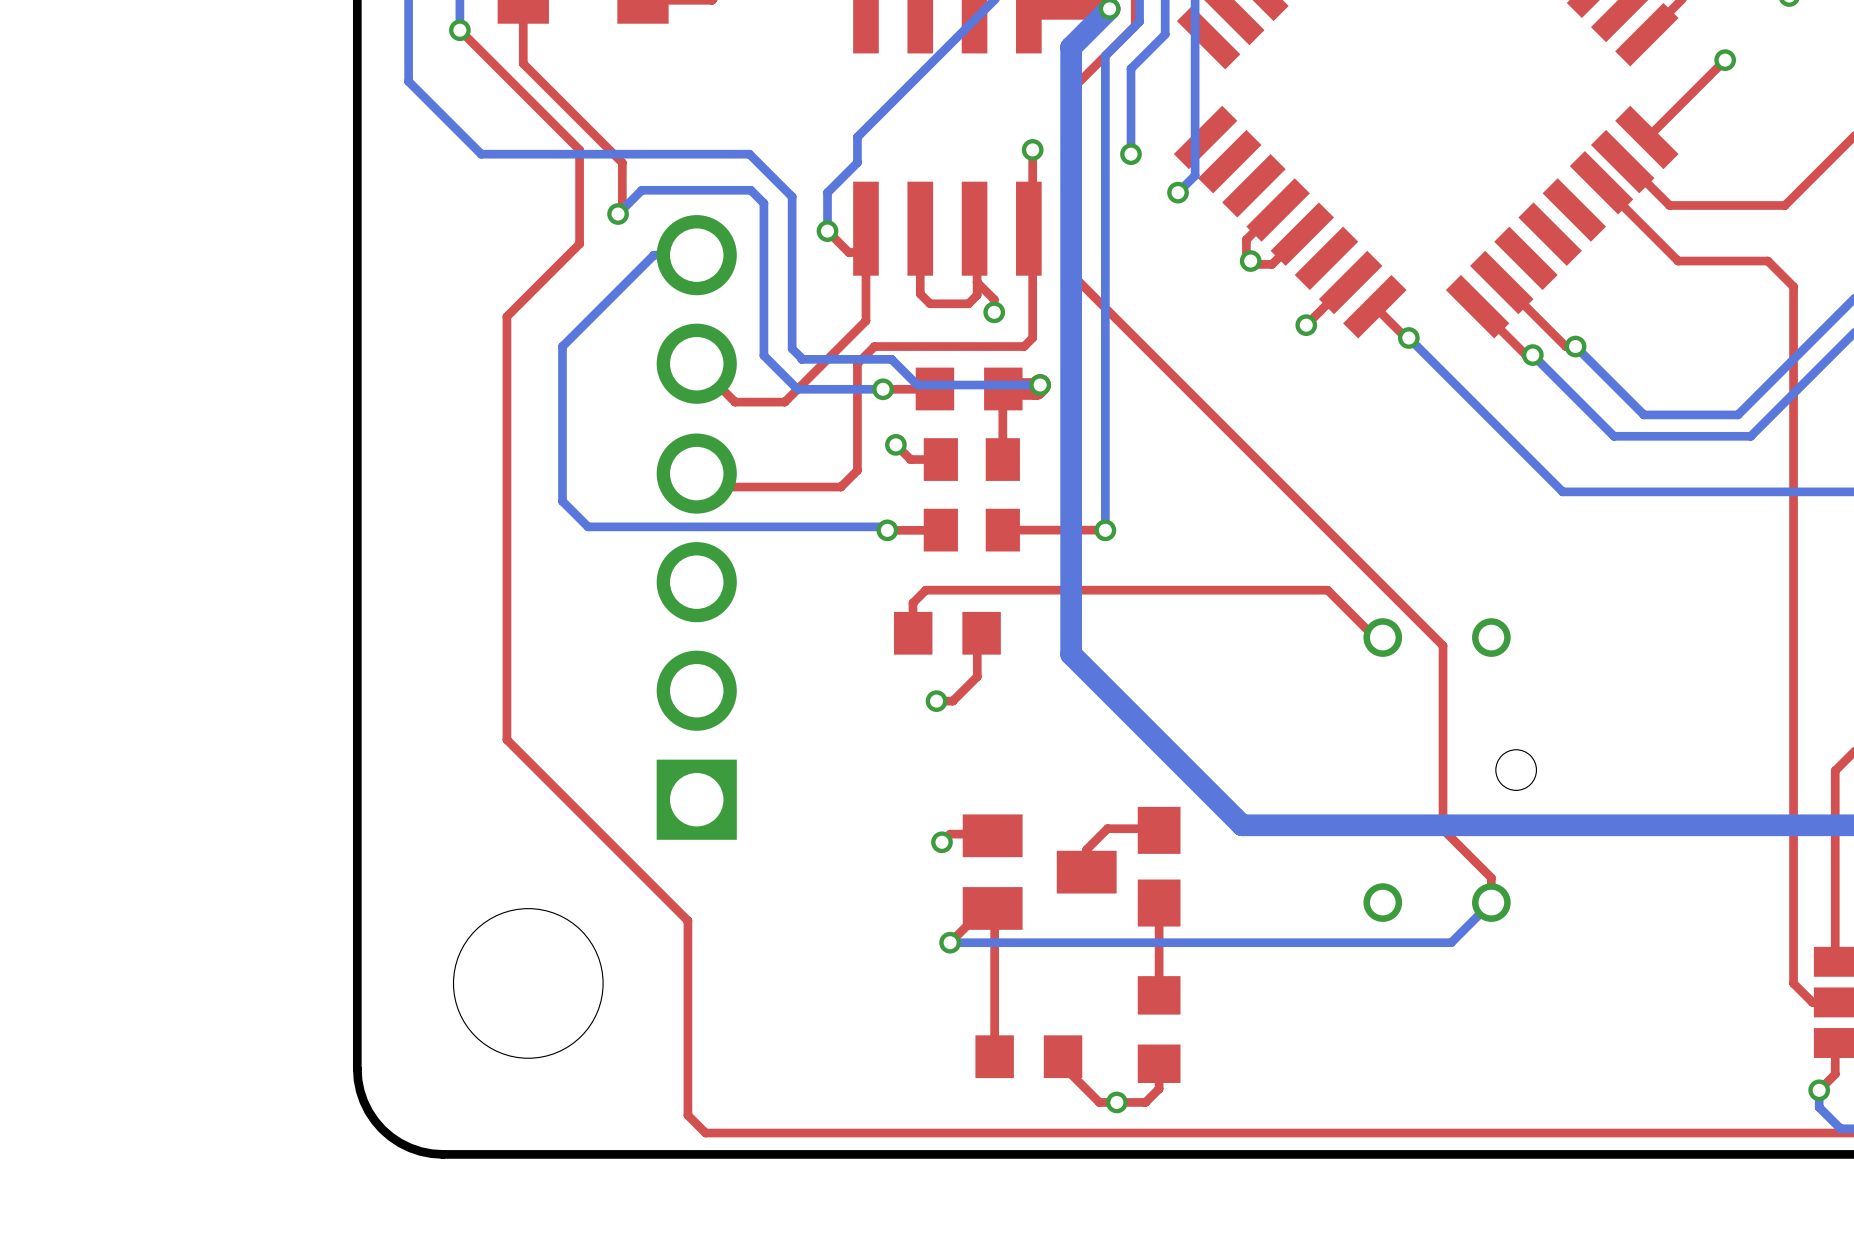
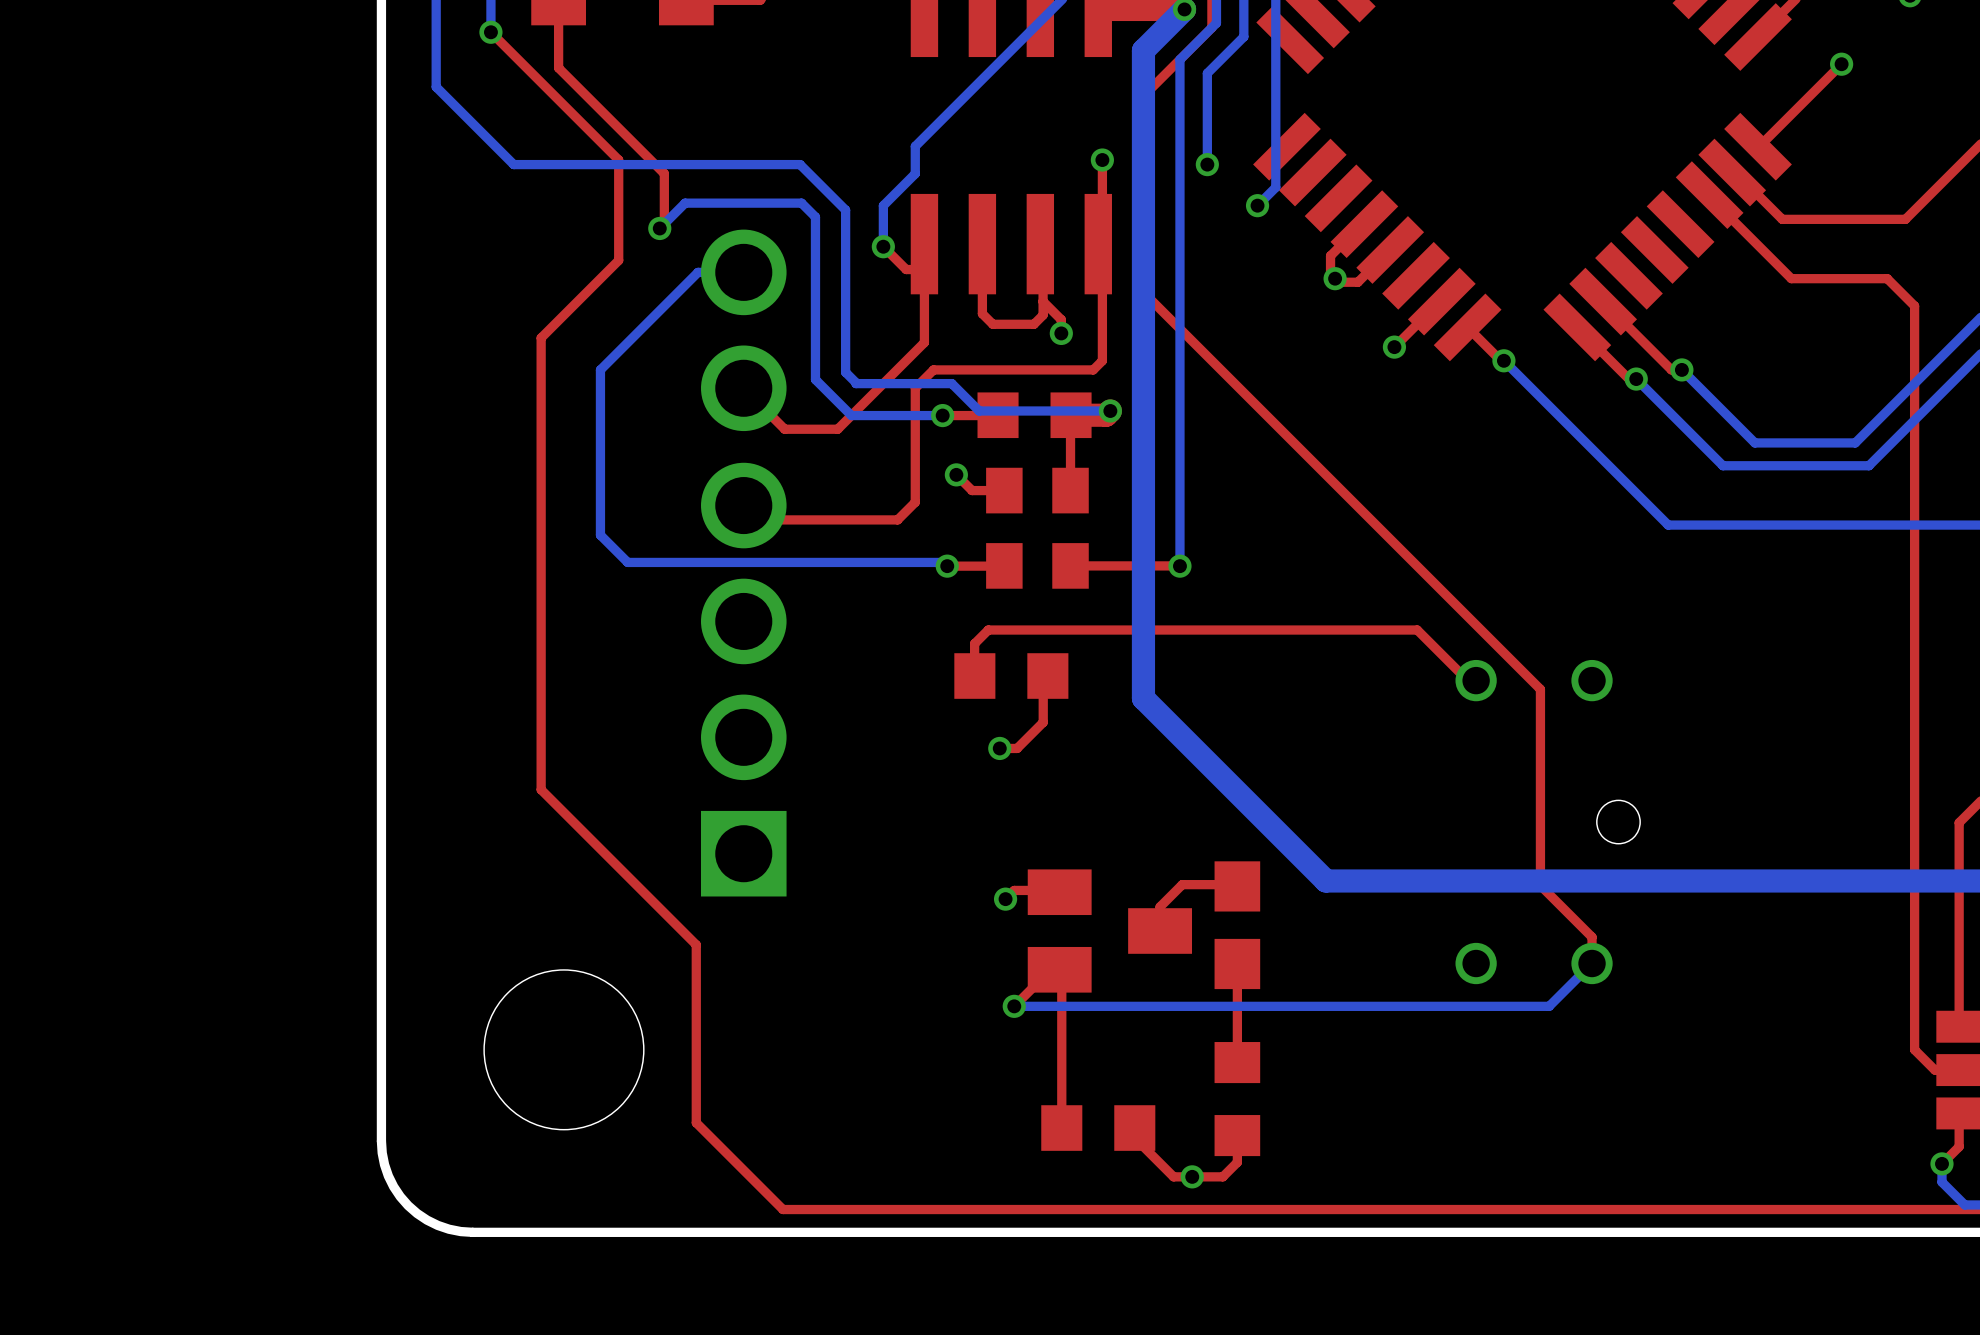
top track: (652, 885) (687, 920) (687, 1115) (705, 1133) (733, 1133) -> (696, 944) (696, 1122) (782, 1209)

